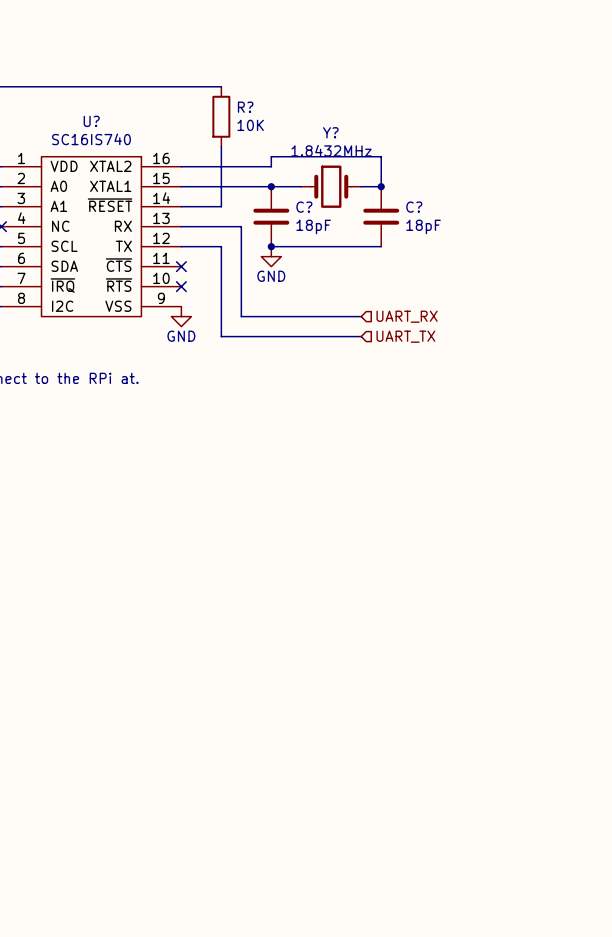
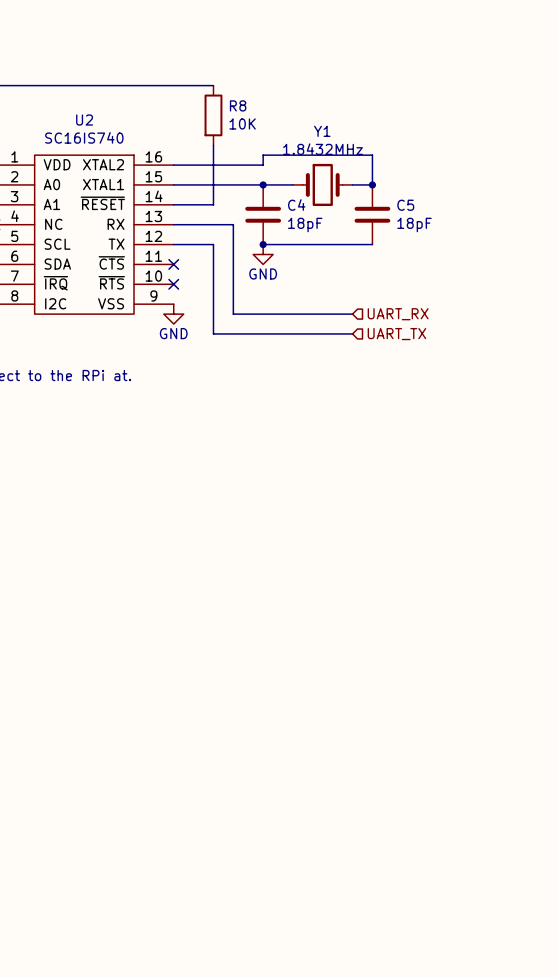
R? name: R? (245, 107) -> R8 (238, 105)
U? name: U? (91, 121) -> U2 (84, 120)
Y? name: Y? (330, 132) -> Y1 (322, 131)
C? name: C? (304, 207) -> C4 (296, 205)
C? name: C? (414, 207) -> C5 (405, 205)

